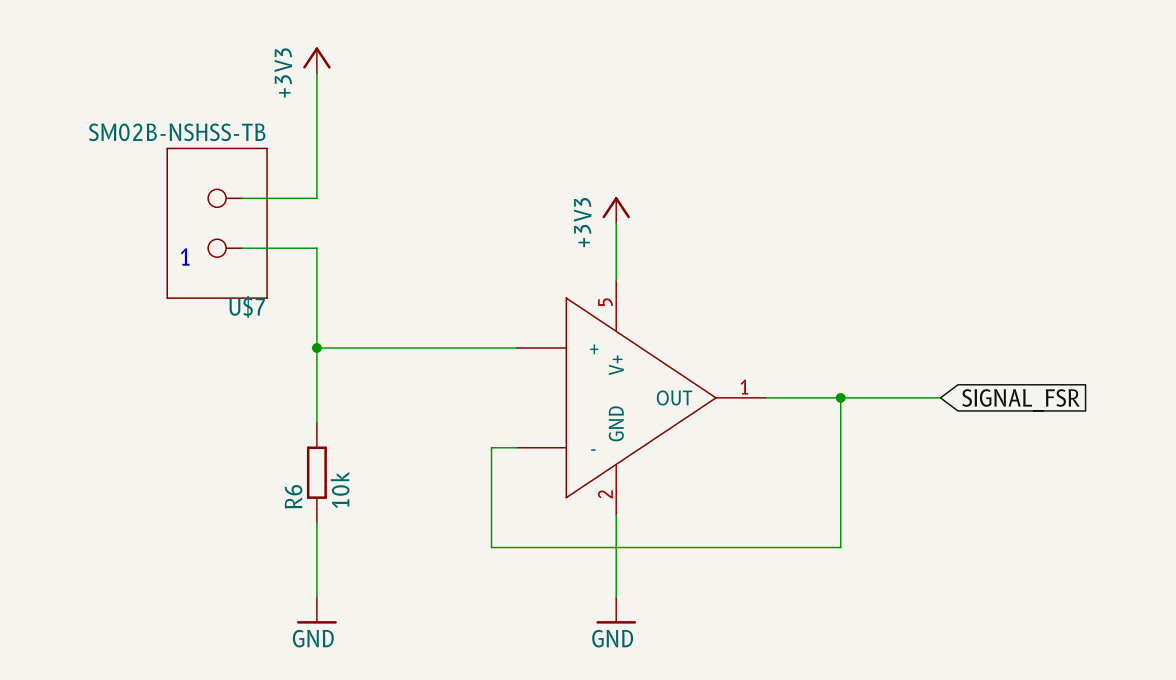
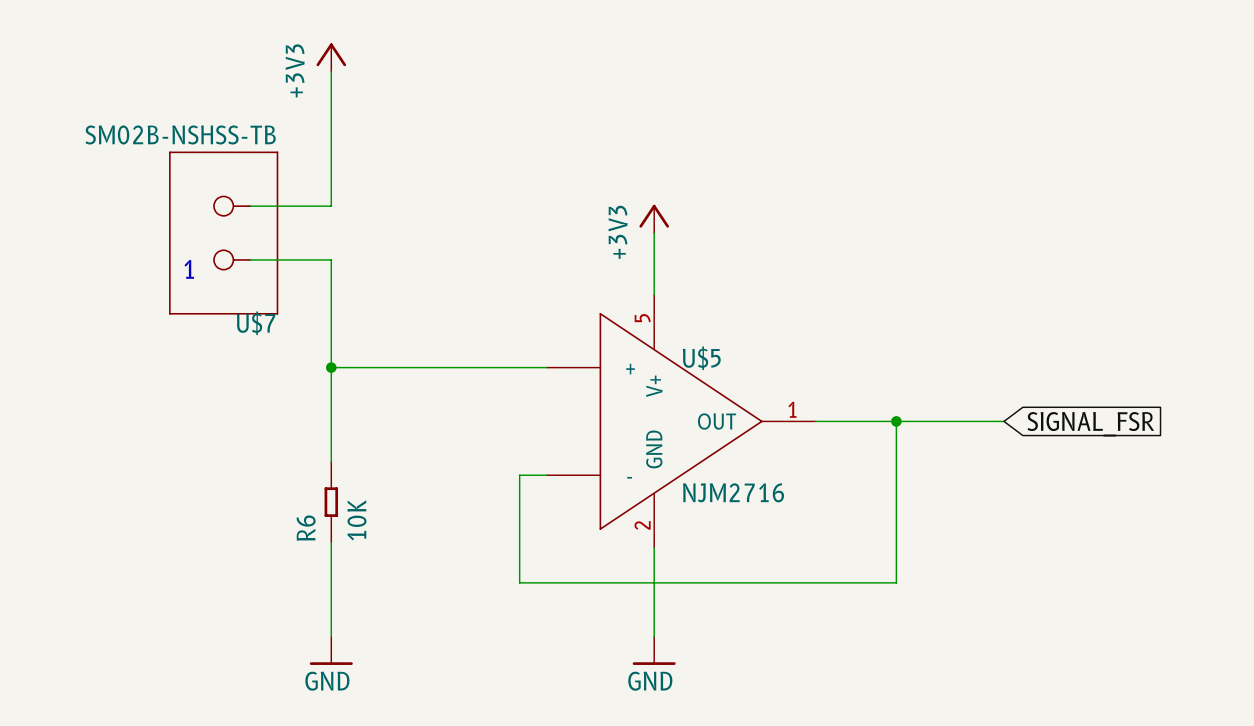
U$5 name: none -> U$5 (701, 358)
R6 symbol: [306, 422, 327, 523] -> [324, 461, 339, 543]
U$5 value: none -> NJM2716 (733, 492)
R6 value: 10k (340, 489) -> 10K (356, 520)

